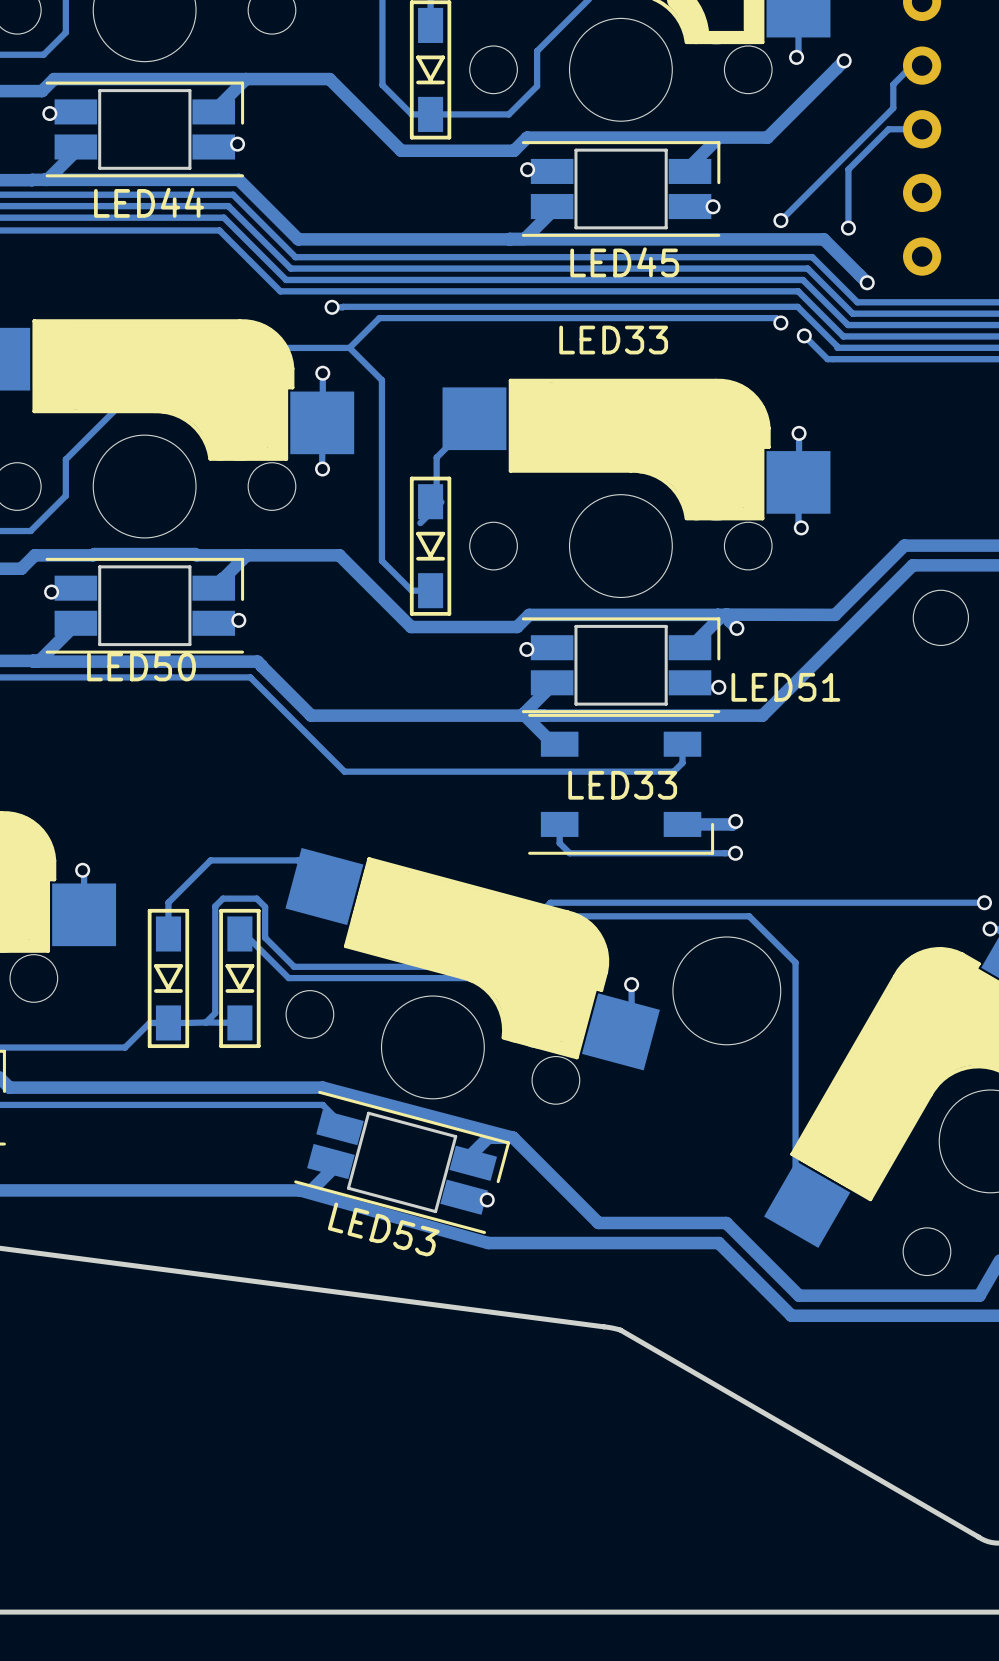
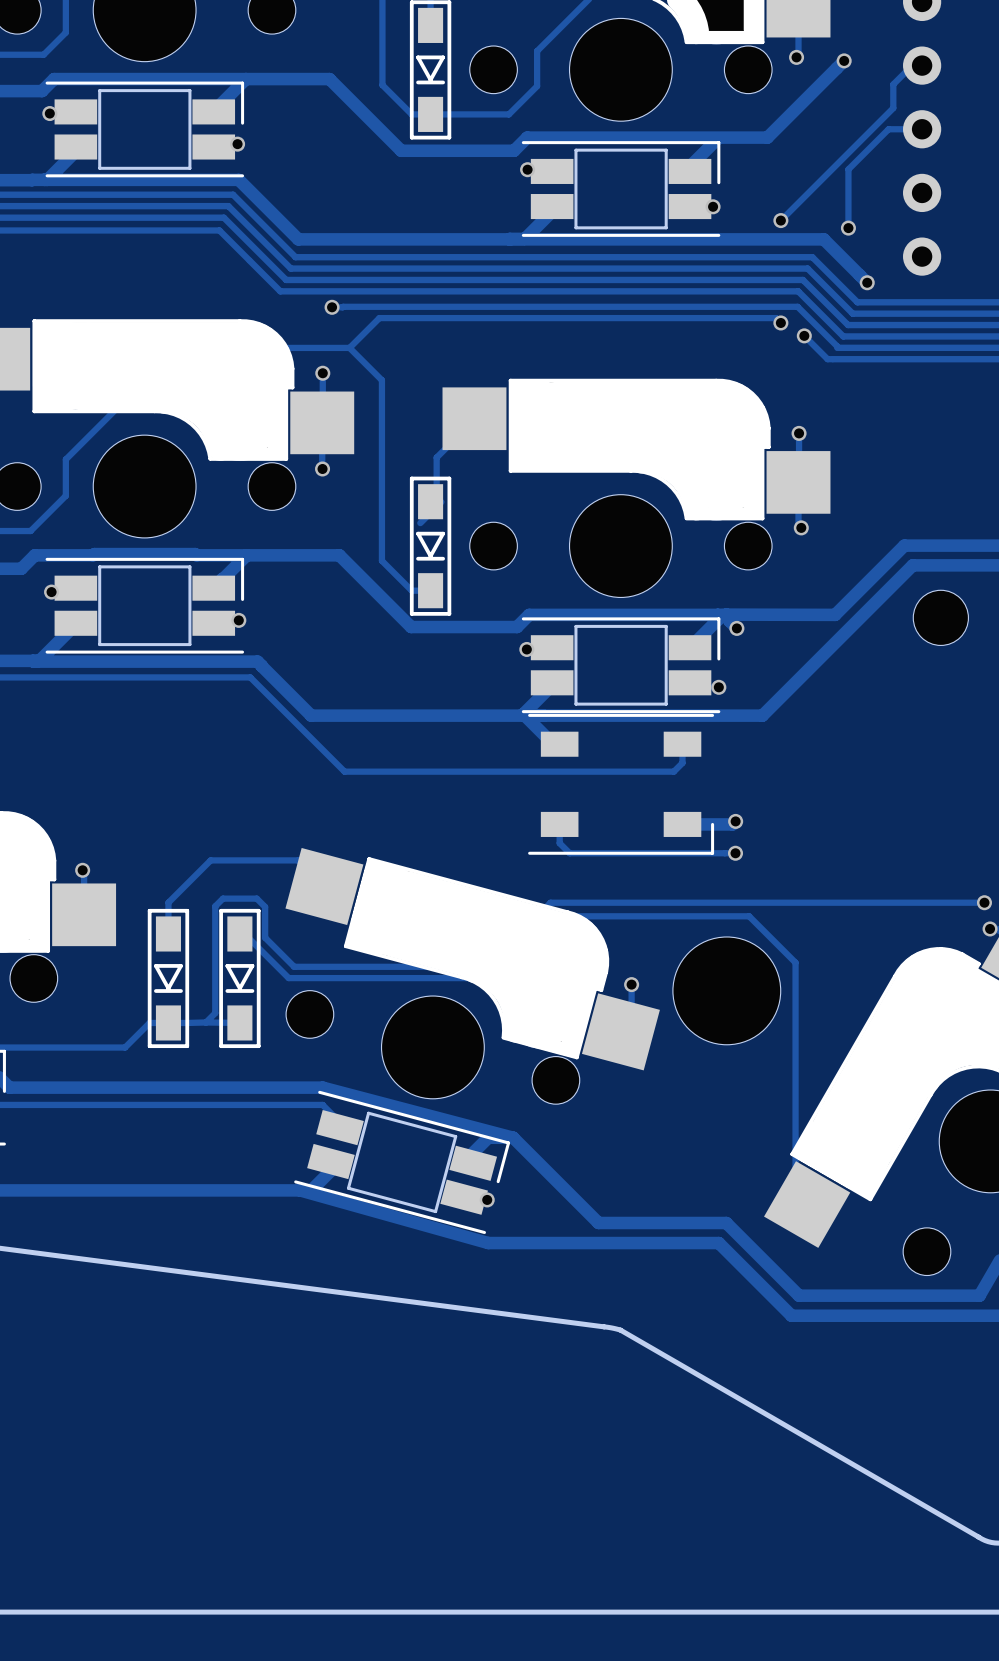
LED44 name: LED44 (149, 202) -> none
LED45 name: LED45 (624, 262) -> none
LED33 name: LED33 (613, 340) -> none
LED50 name: LED50 (141, 666) -> none
LED51 name: LED51 (785, 687) -> none
LED33 text: LED33 (622, 785) -> none
LED53 name: LED53 (383, 1229) -> none

